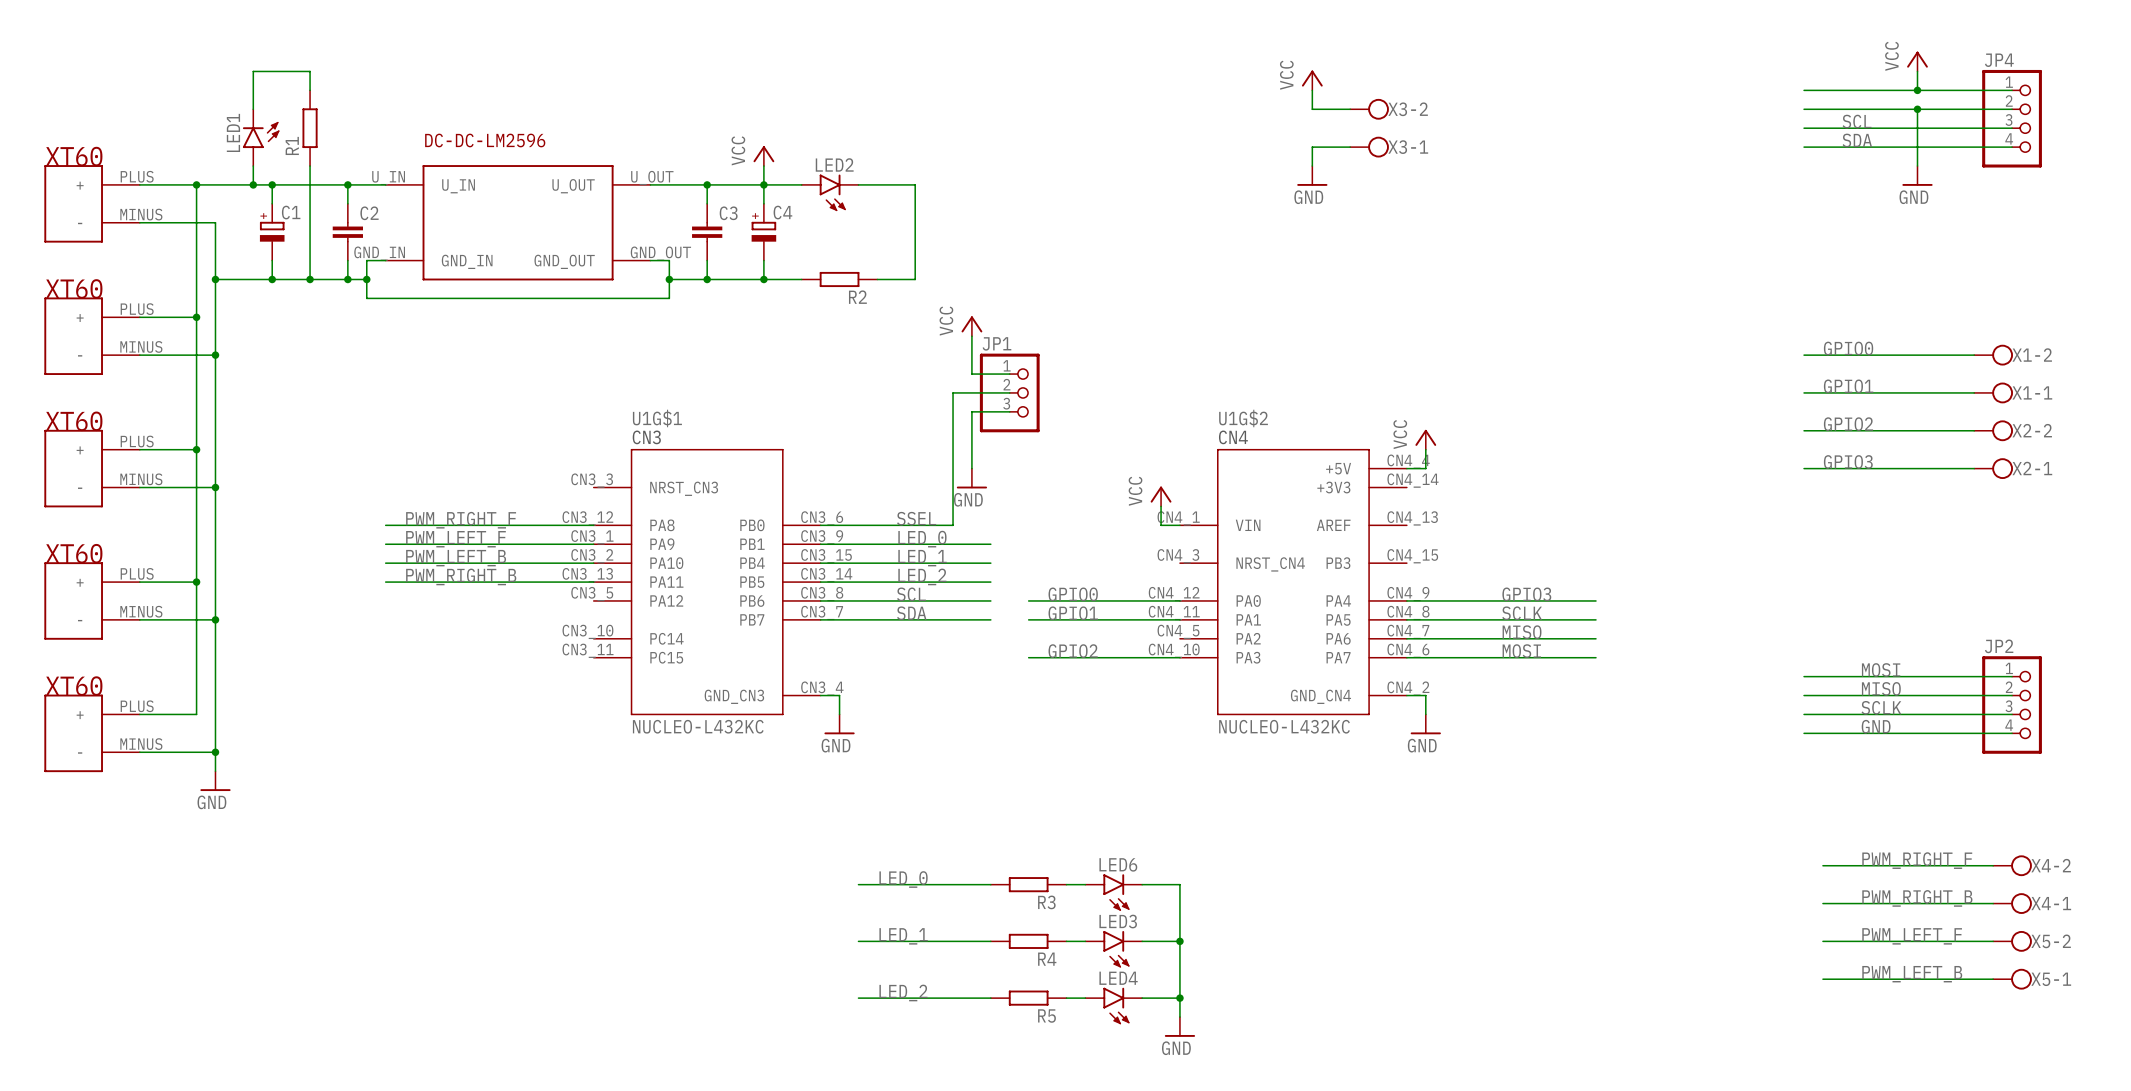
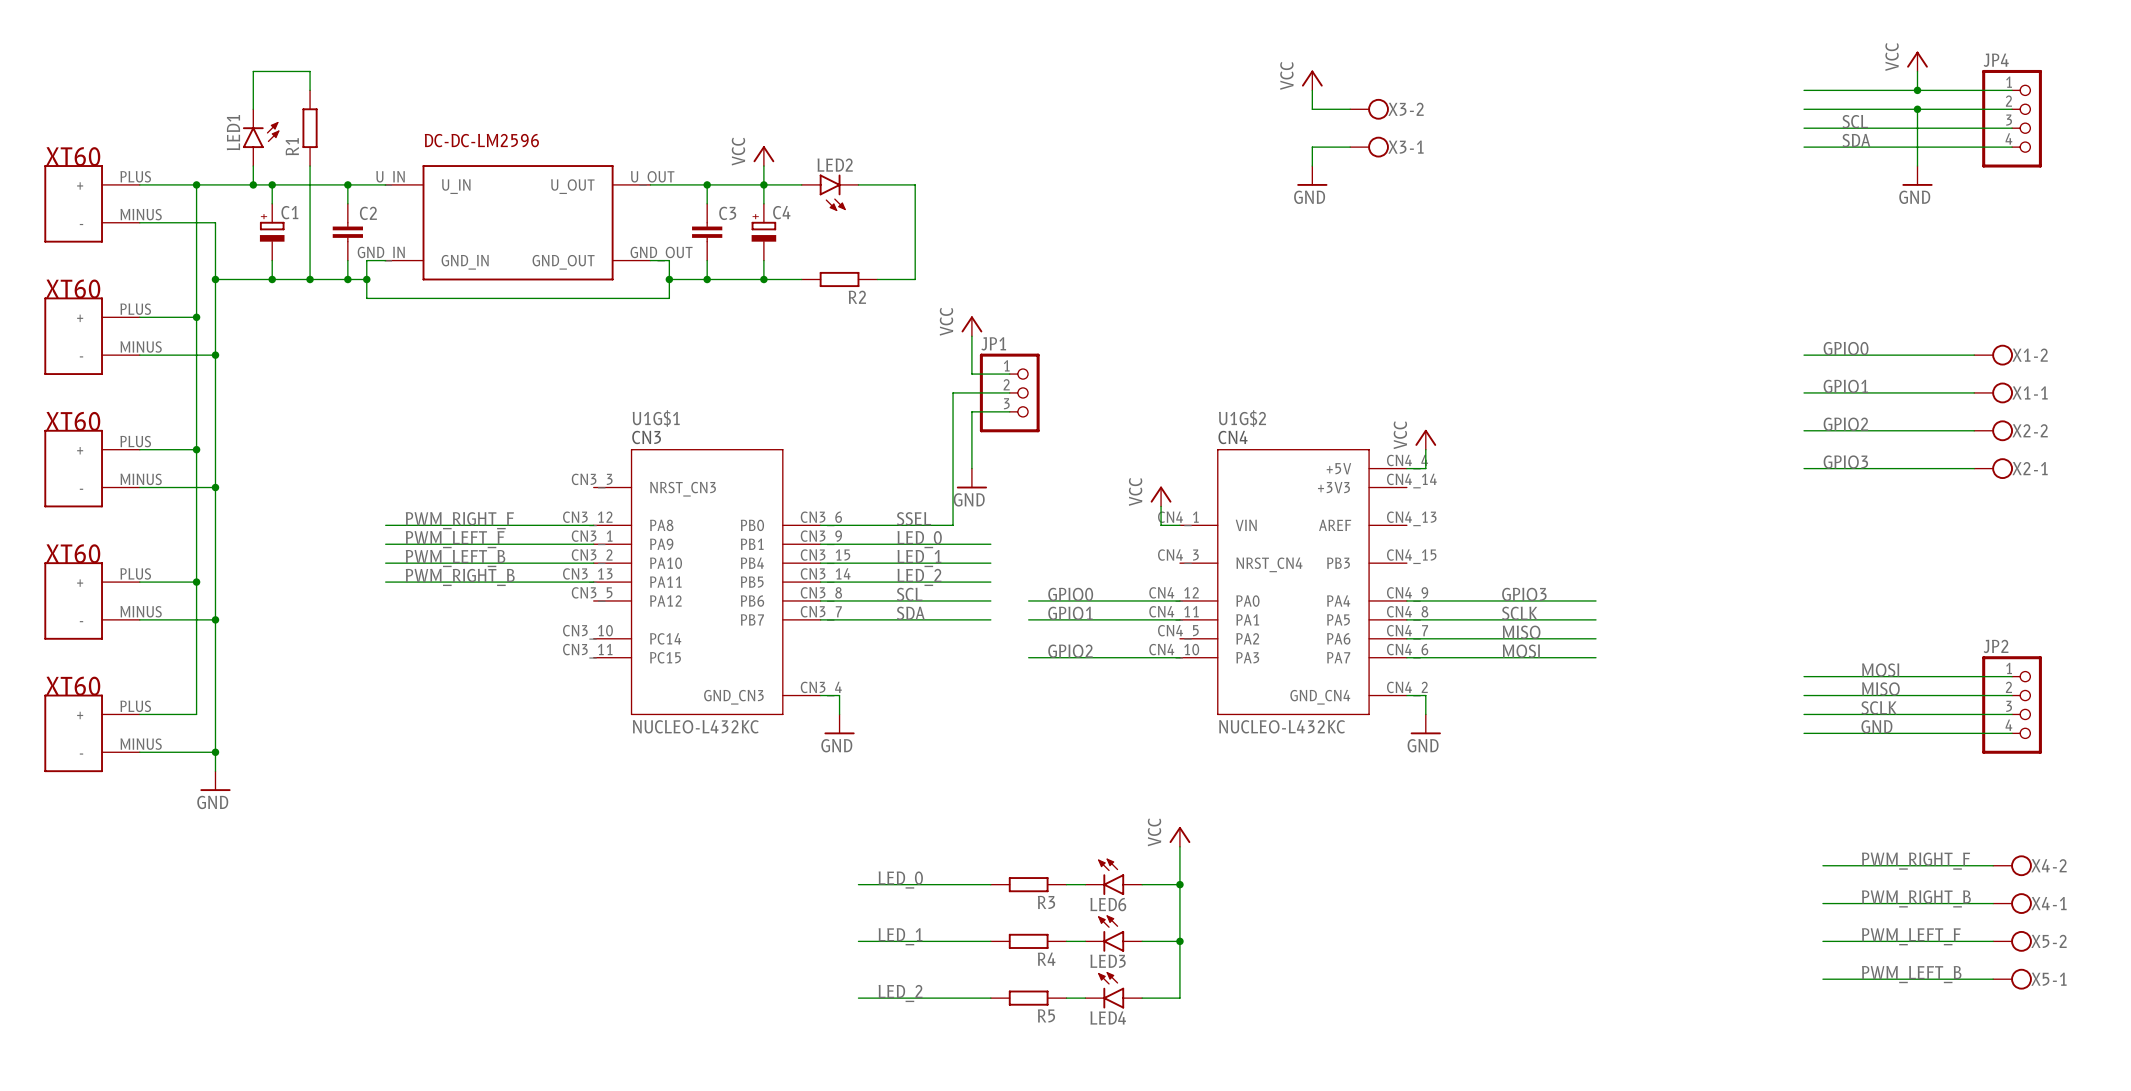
power symbol: none -> VCC (1179, 836)
wire: none -> (1179, 846) (1179, 884)
junction: none -> (1179, 884)
LED6 rotation: 0° (1116, 892) -> 180° (1111, 876)
LED3 rotation: 0° (1116, 949) -> 180° (1111, 933)
wire: (1179, 998) (1179, 1017) -> none
junction: (1179, 998) -> none
LED4 rotation: 0° (1116, 1005) -> 180° (1111, 990)
power symbol: GND (1179, 1026) -> none

